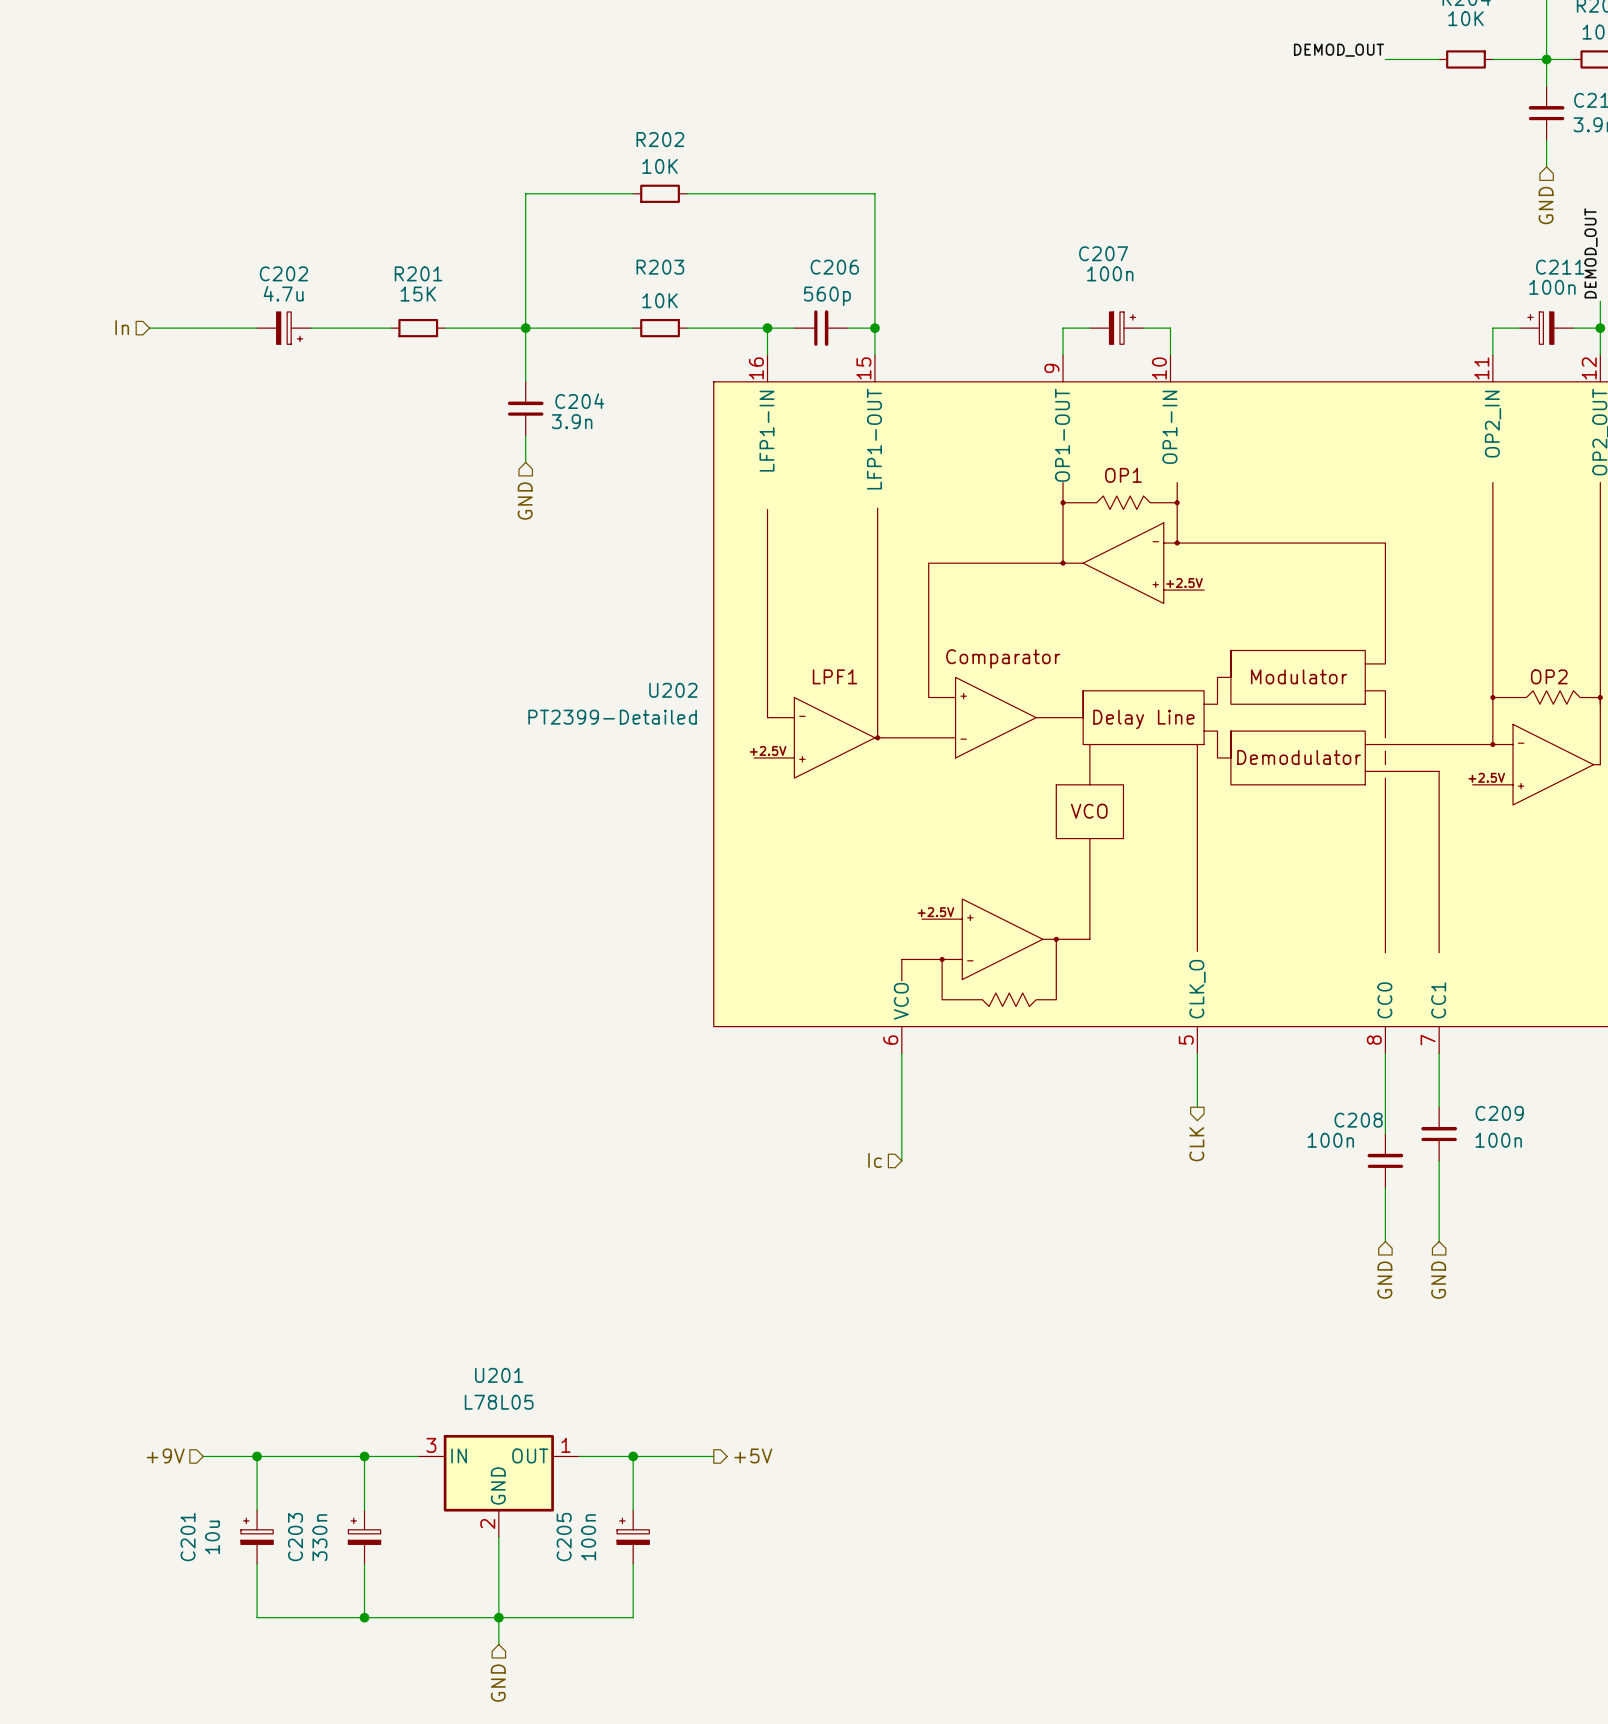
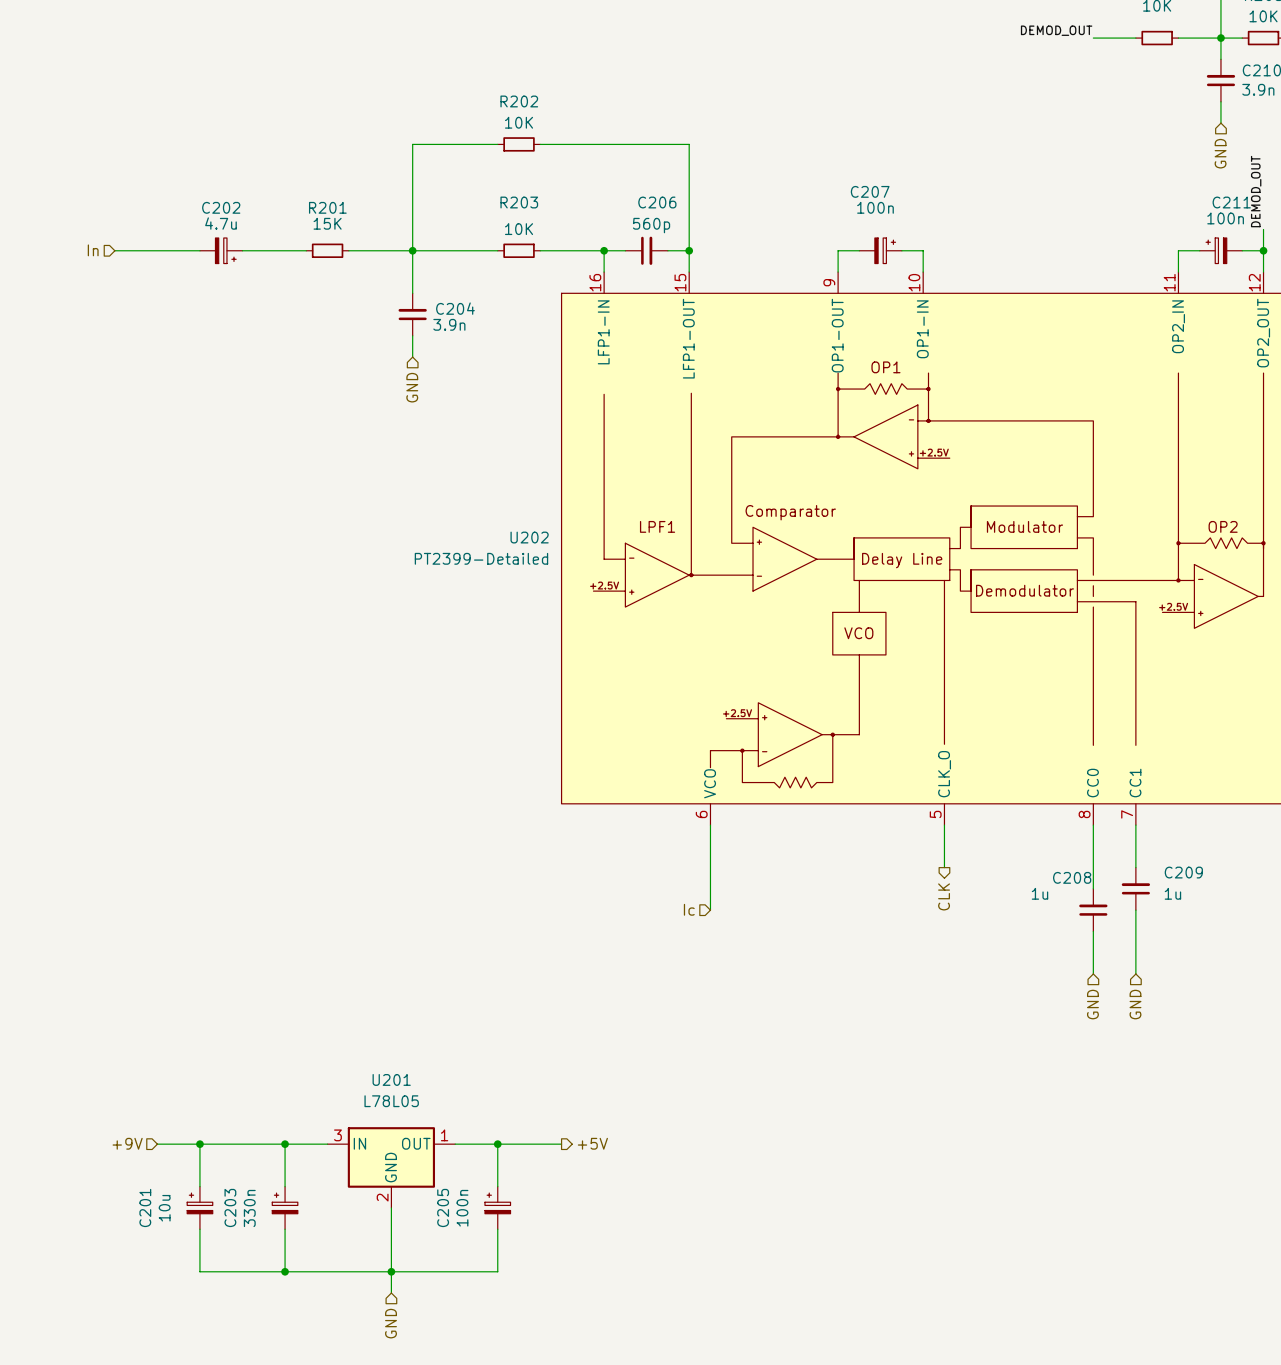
C208 value: 100n (1330, 1140) -> 1u (1040, 893)
C209 value: 100n (1498, 1140) -> 1u (1172, 893)

